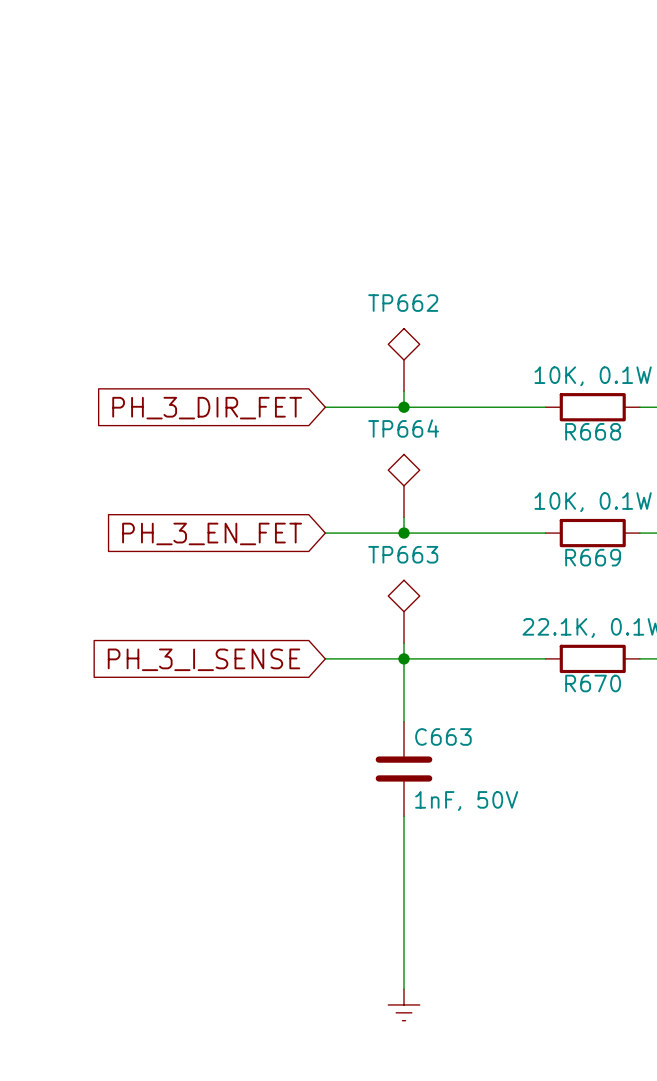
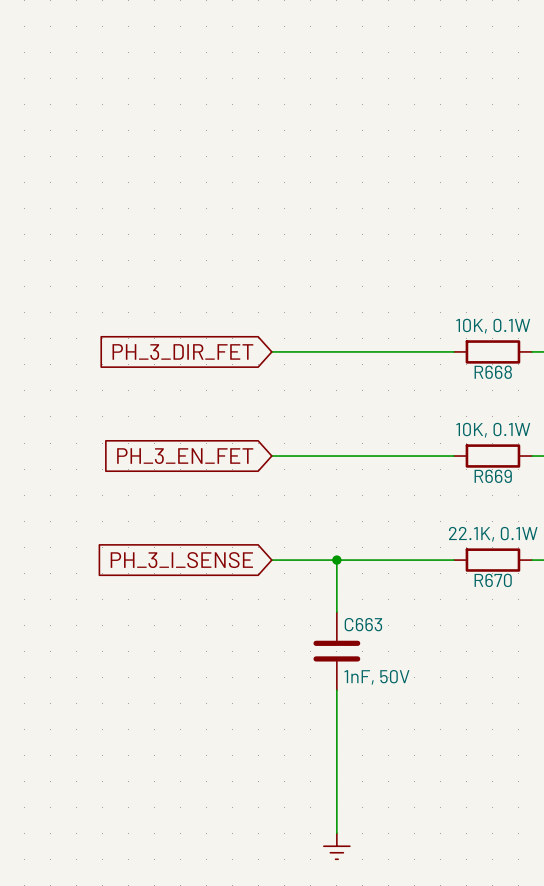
TP662: (403, 360) -> none
wire: (403, 391) (403, 407) -> none
junction: (403, 407) -> none
TP664: (403, 485) -> none
wire: (403, 517) (403, 533) -> none
junction: (403, 533) -> none
TP663: (403, 611) -> none
wire: (403, 643) (403, 658) -> none

